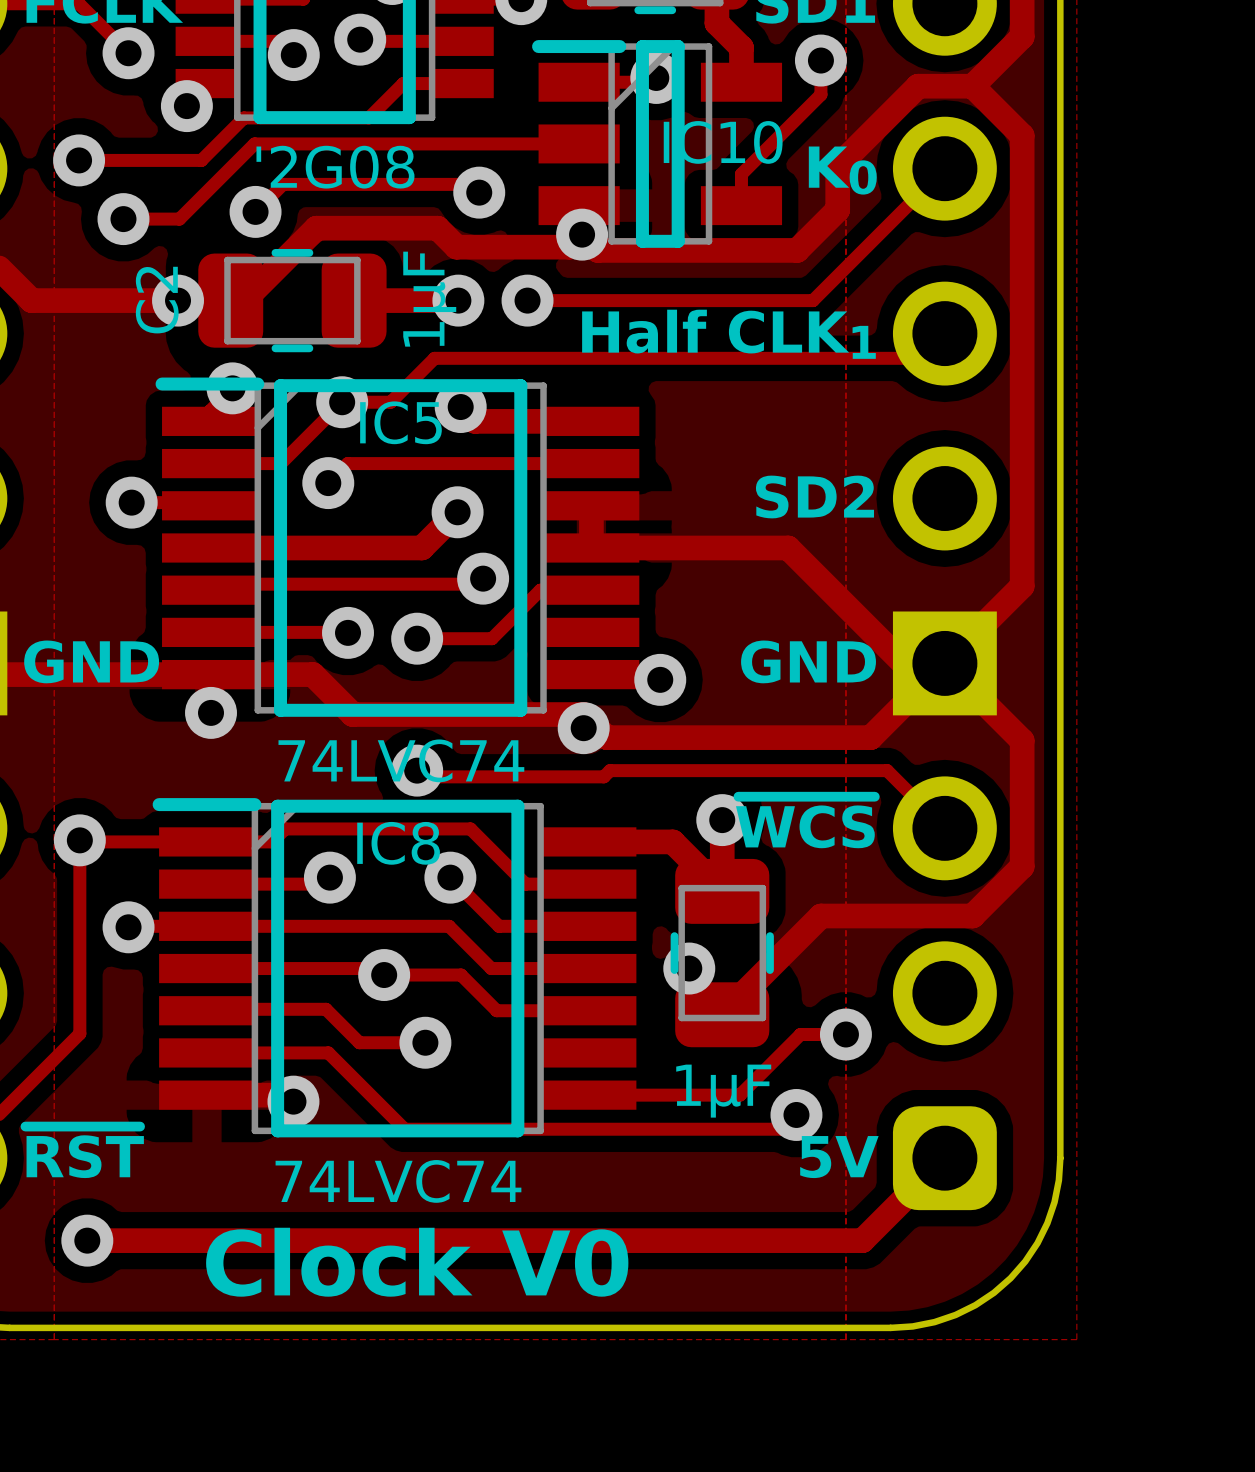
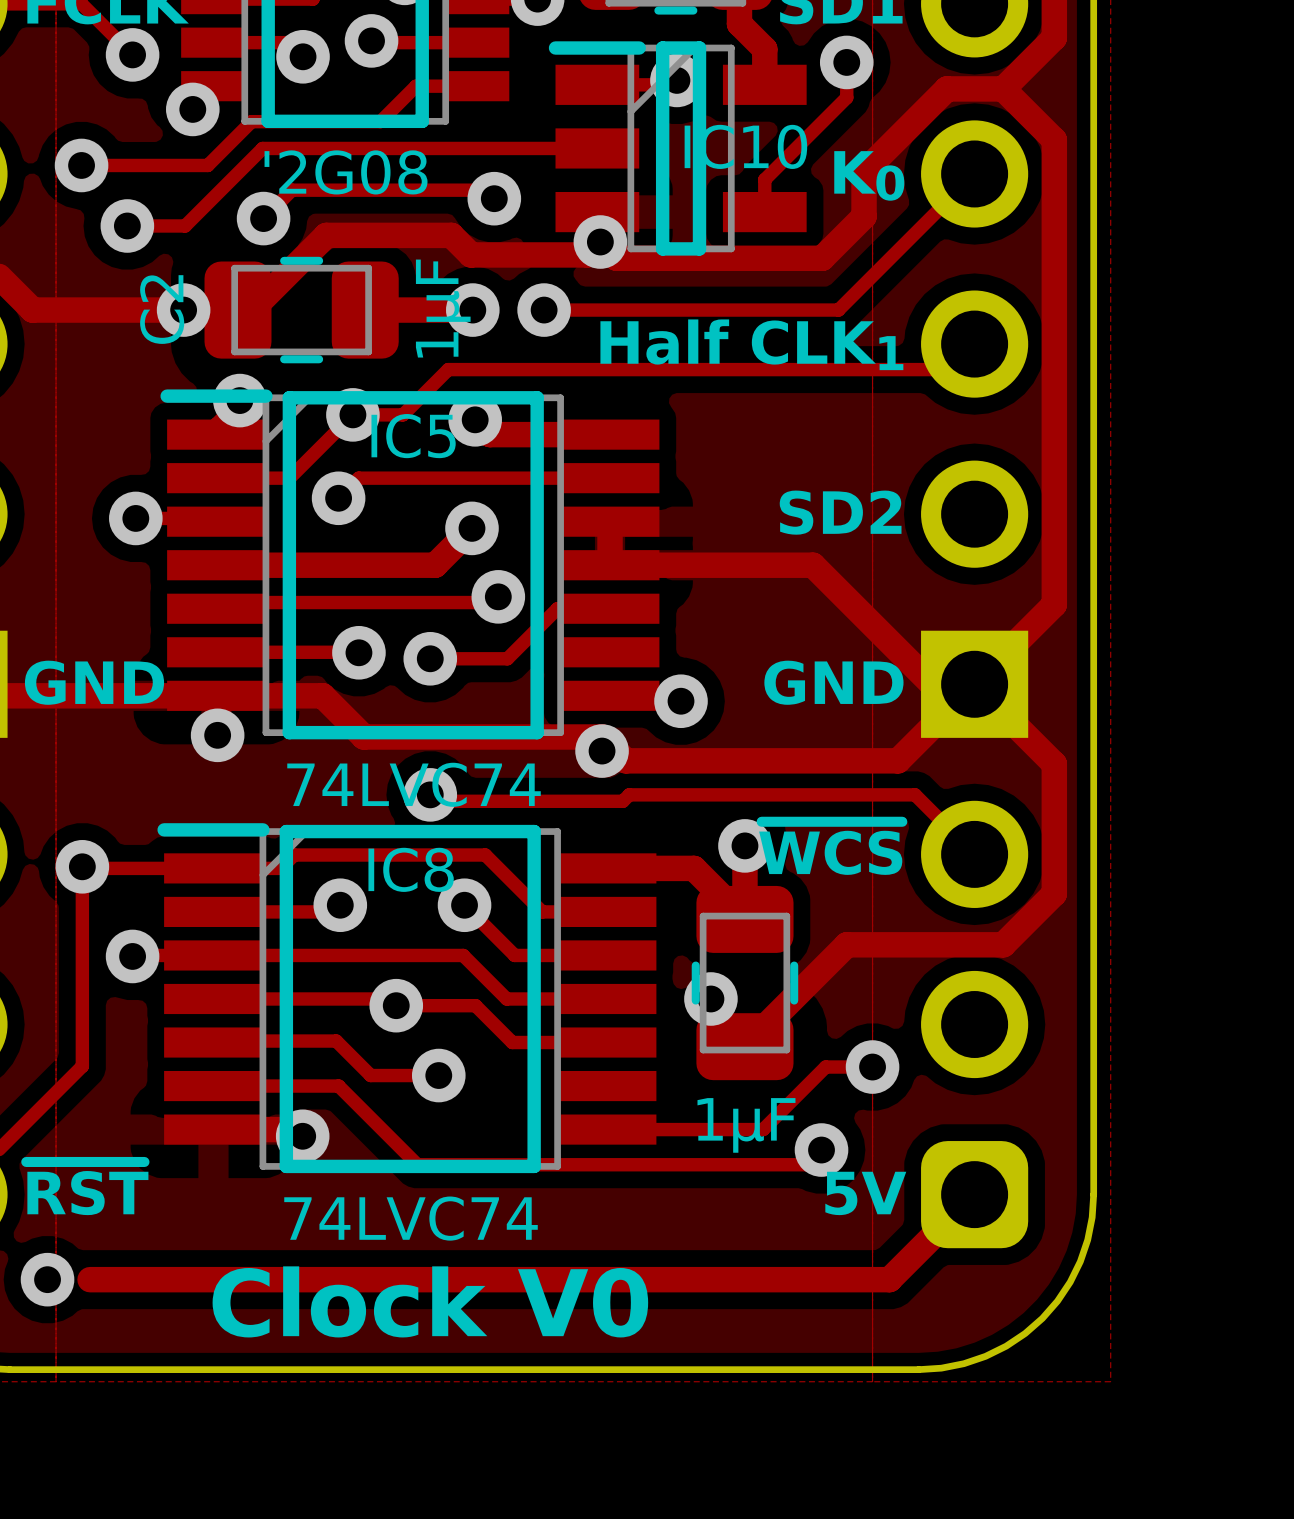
via position: (87, 1240) -> (47, 1279)

